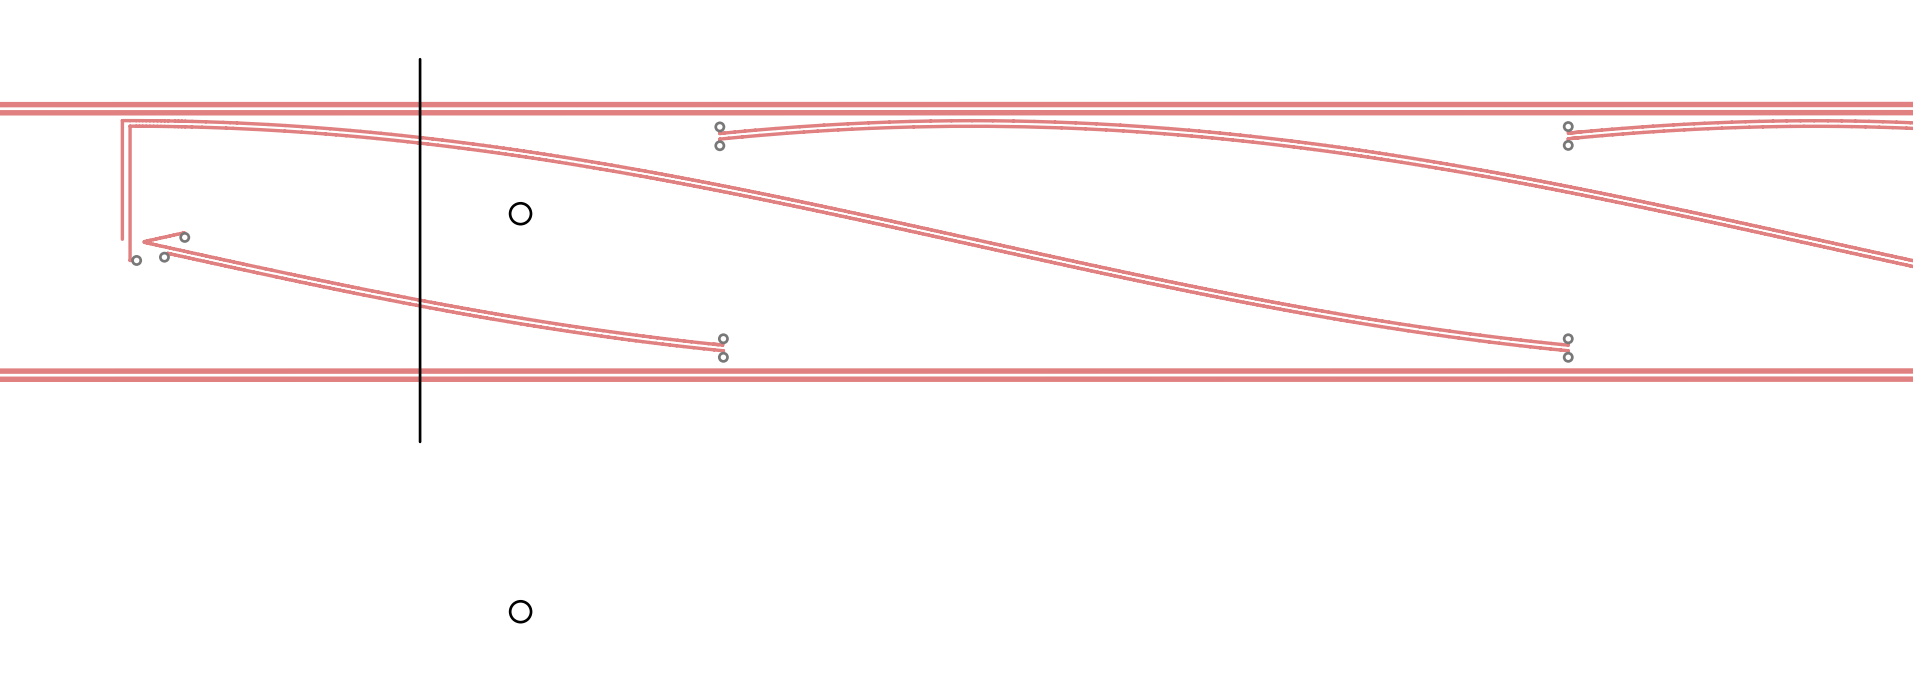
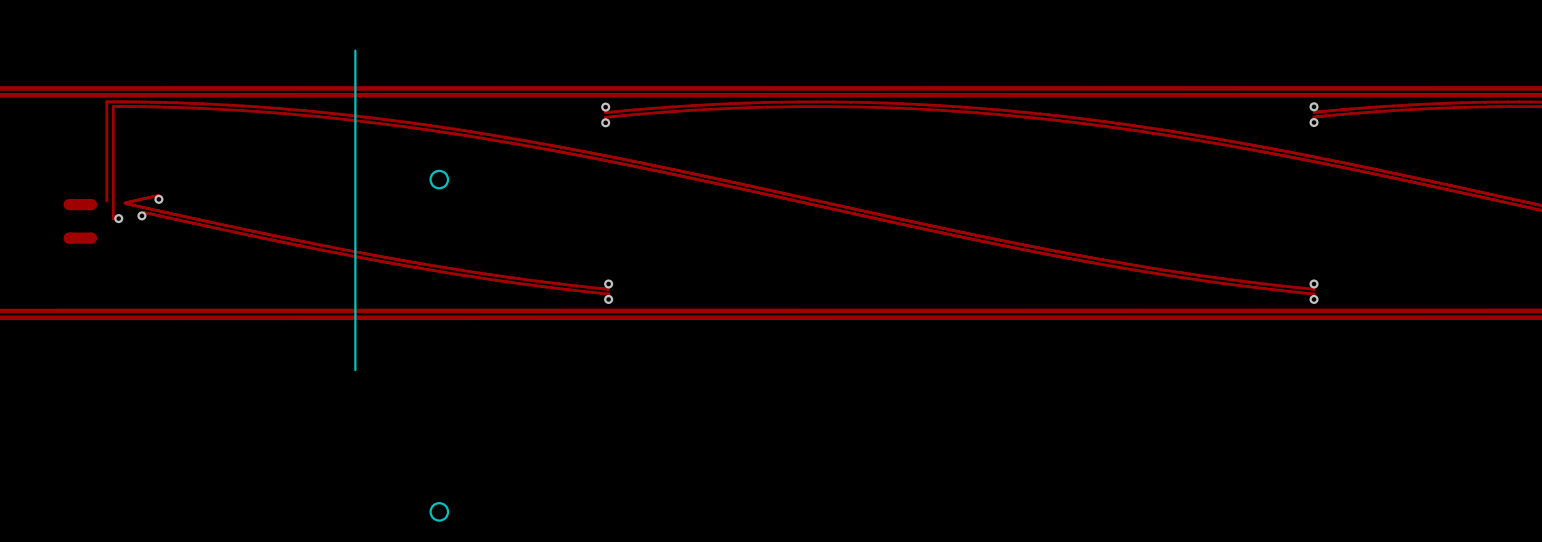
part: none -> (80, 204)
part: none -> (80, 238)

